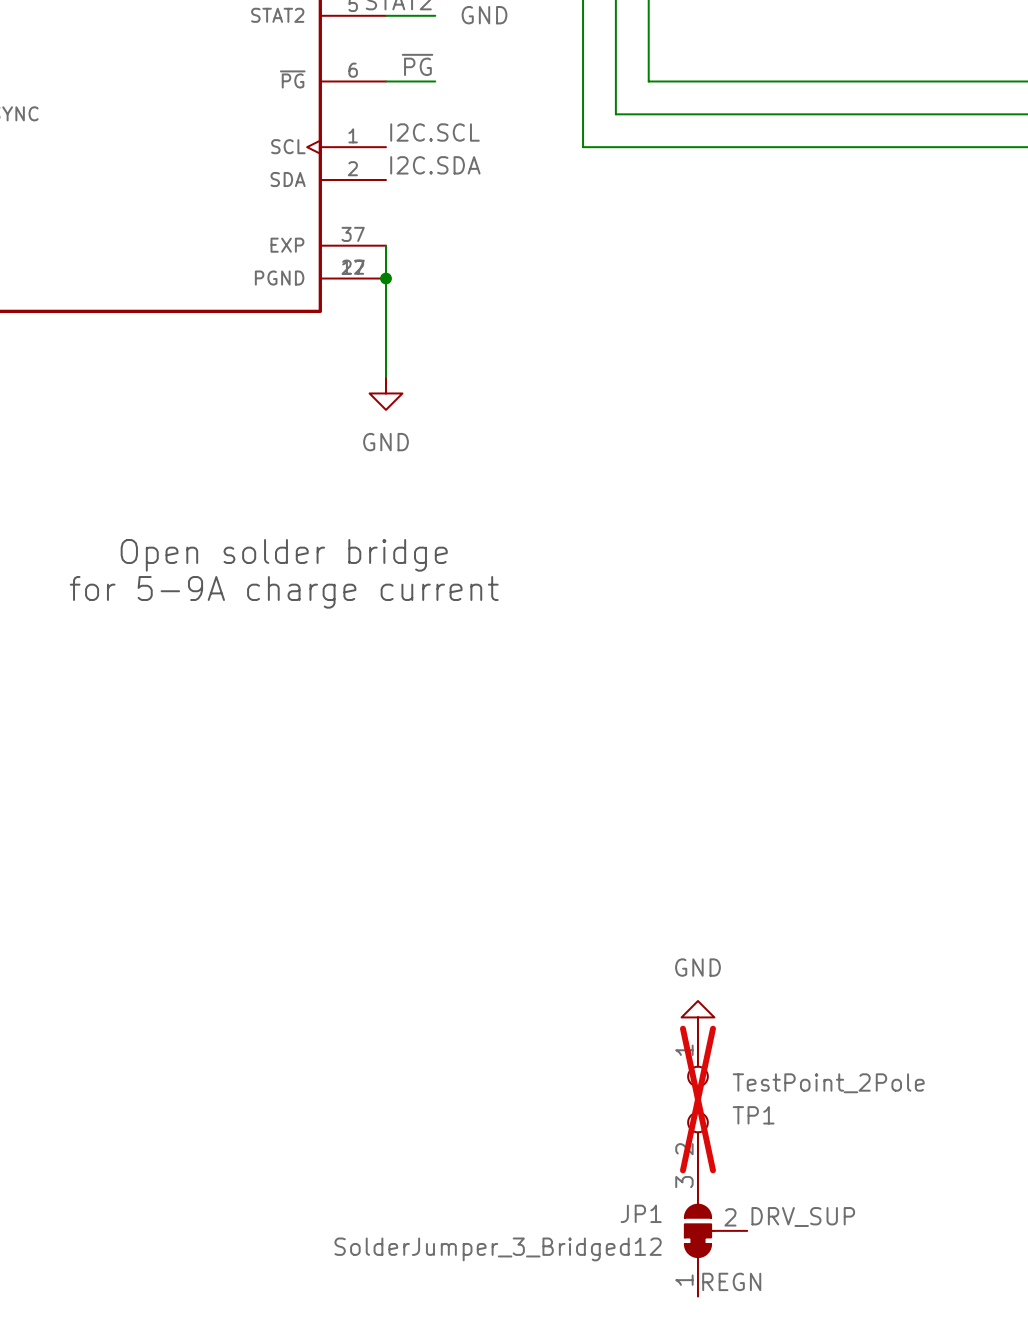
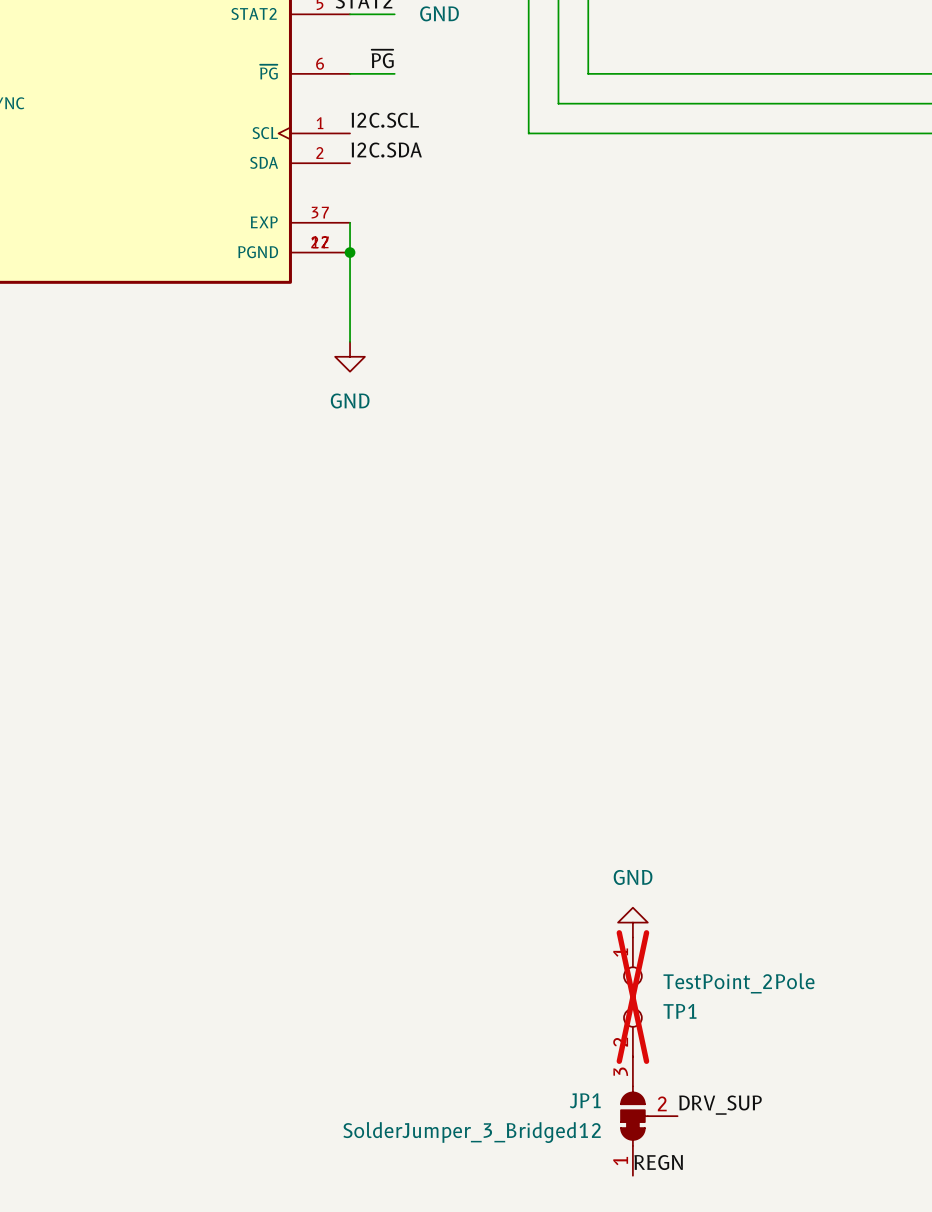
text: Open solder bridge (284, 555) -> none
text: for 5-9A charge current (284, 592) -> none

